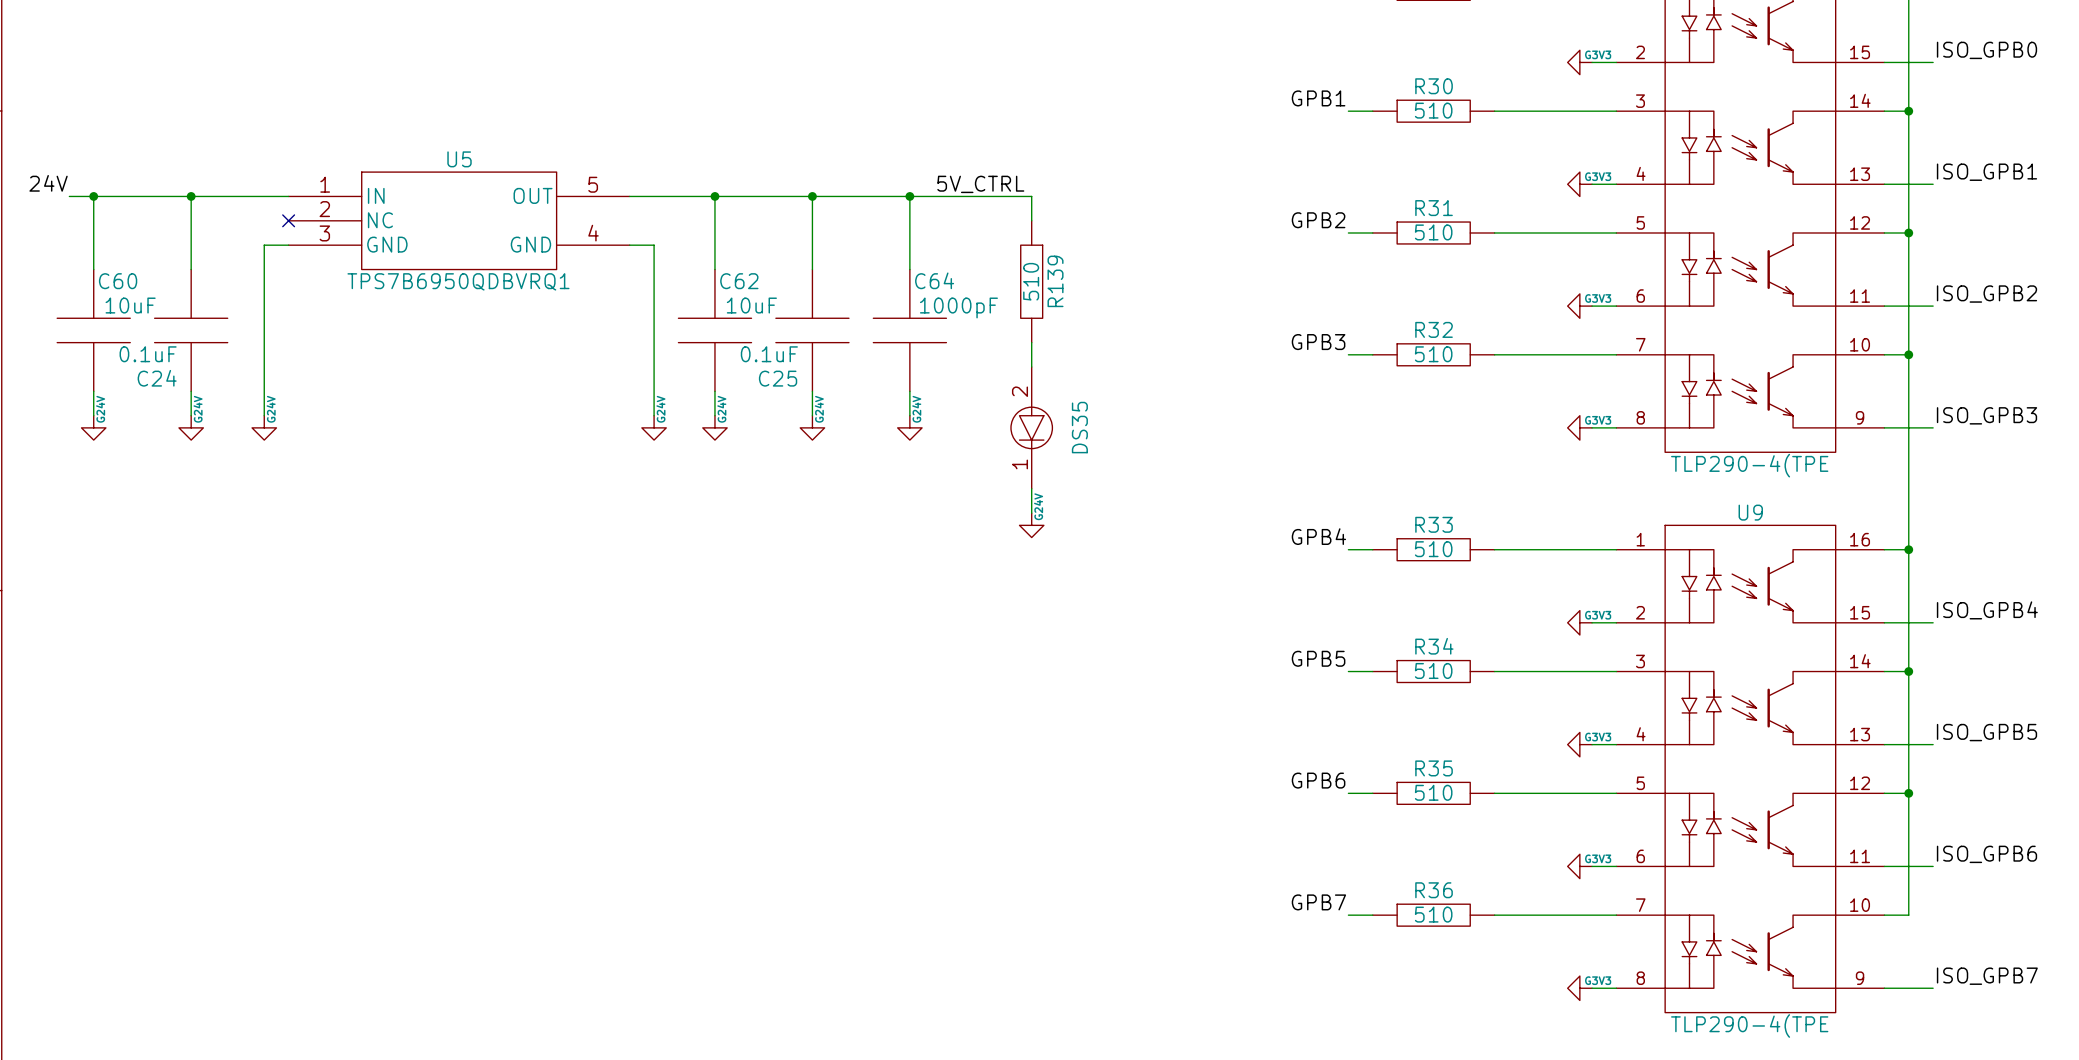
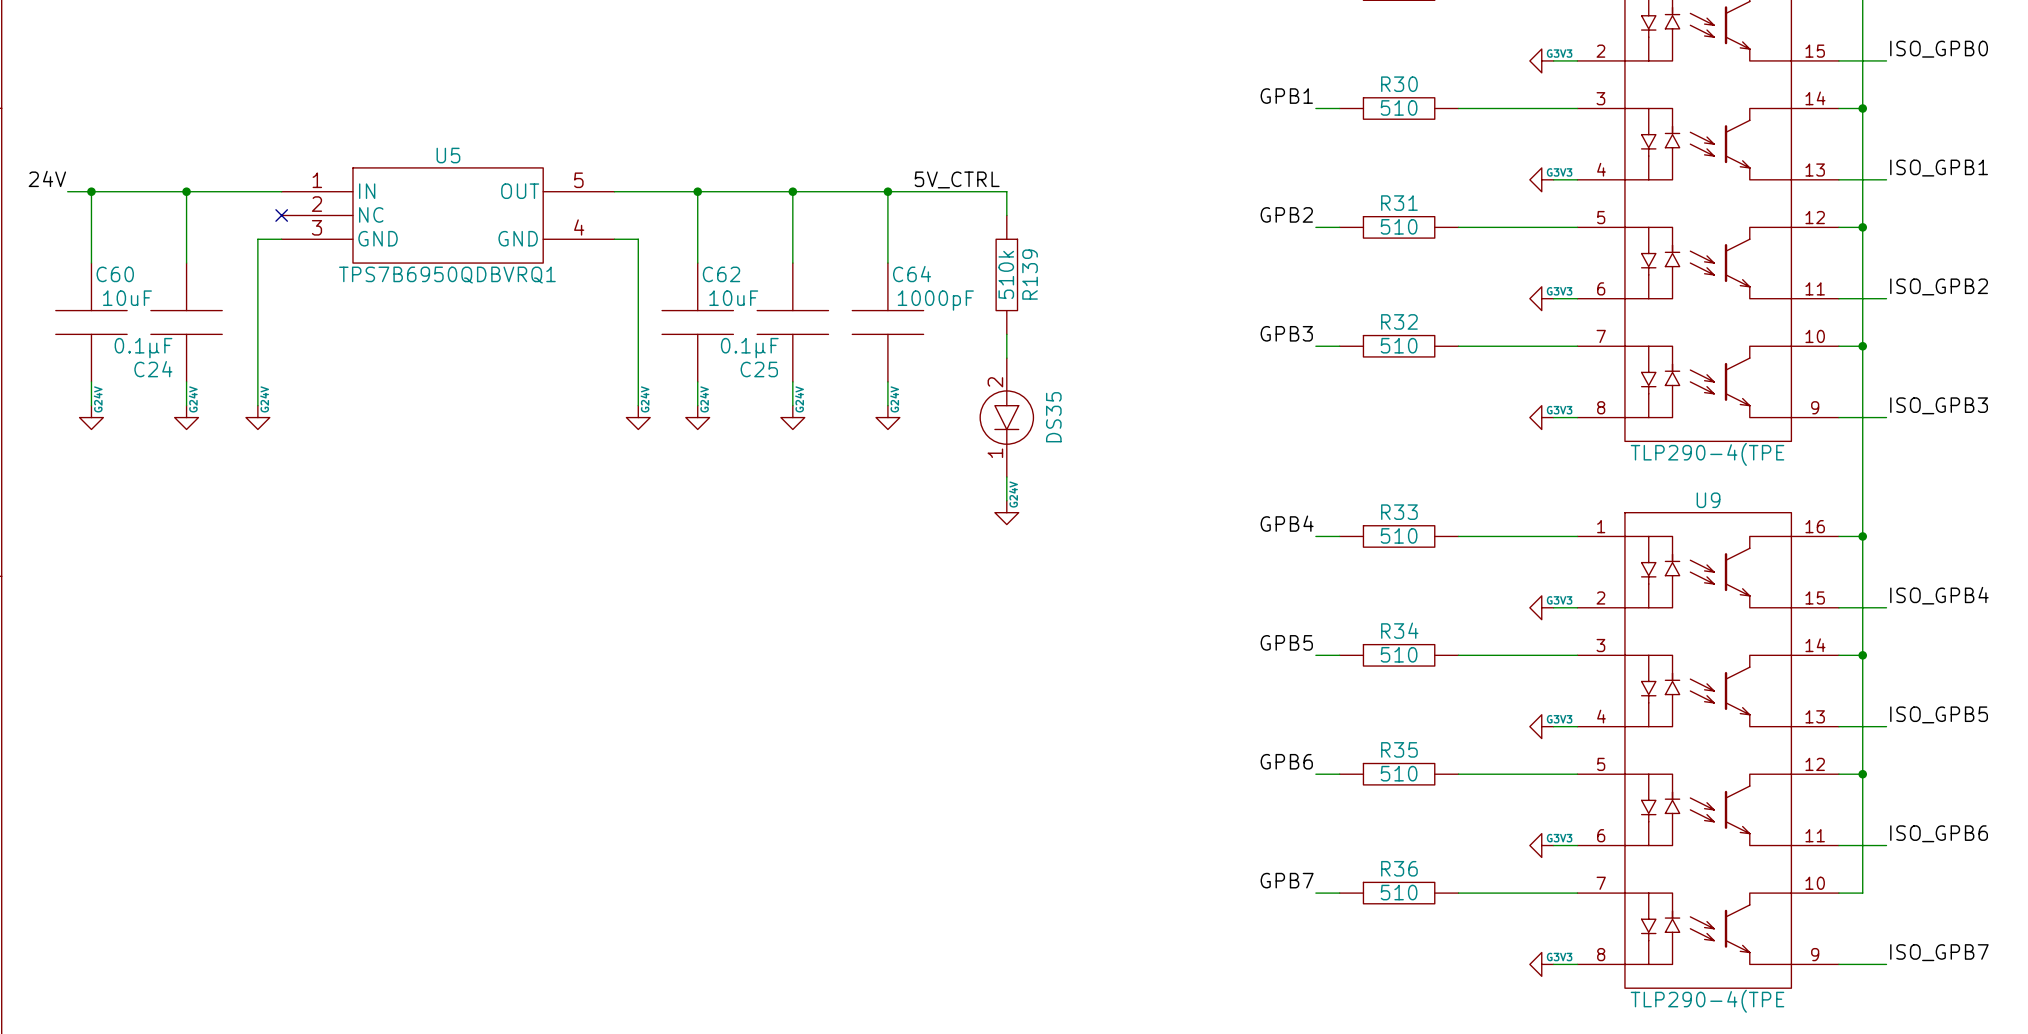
R139 text: 510 (1031, 281) -> 510k (1006, 274)
C24 text: 0.1uF (148, 354) -> 0.1µF (143, 348)
C25 text: 0.1uF (769, 354) -> 0.1µF (749, 348)
DS35 symbol: [1010, 366, 1053, 489] -> [980, 358, 1034, 478]

